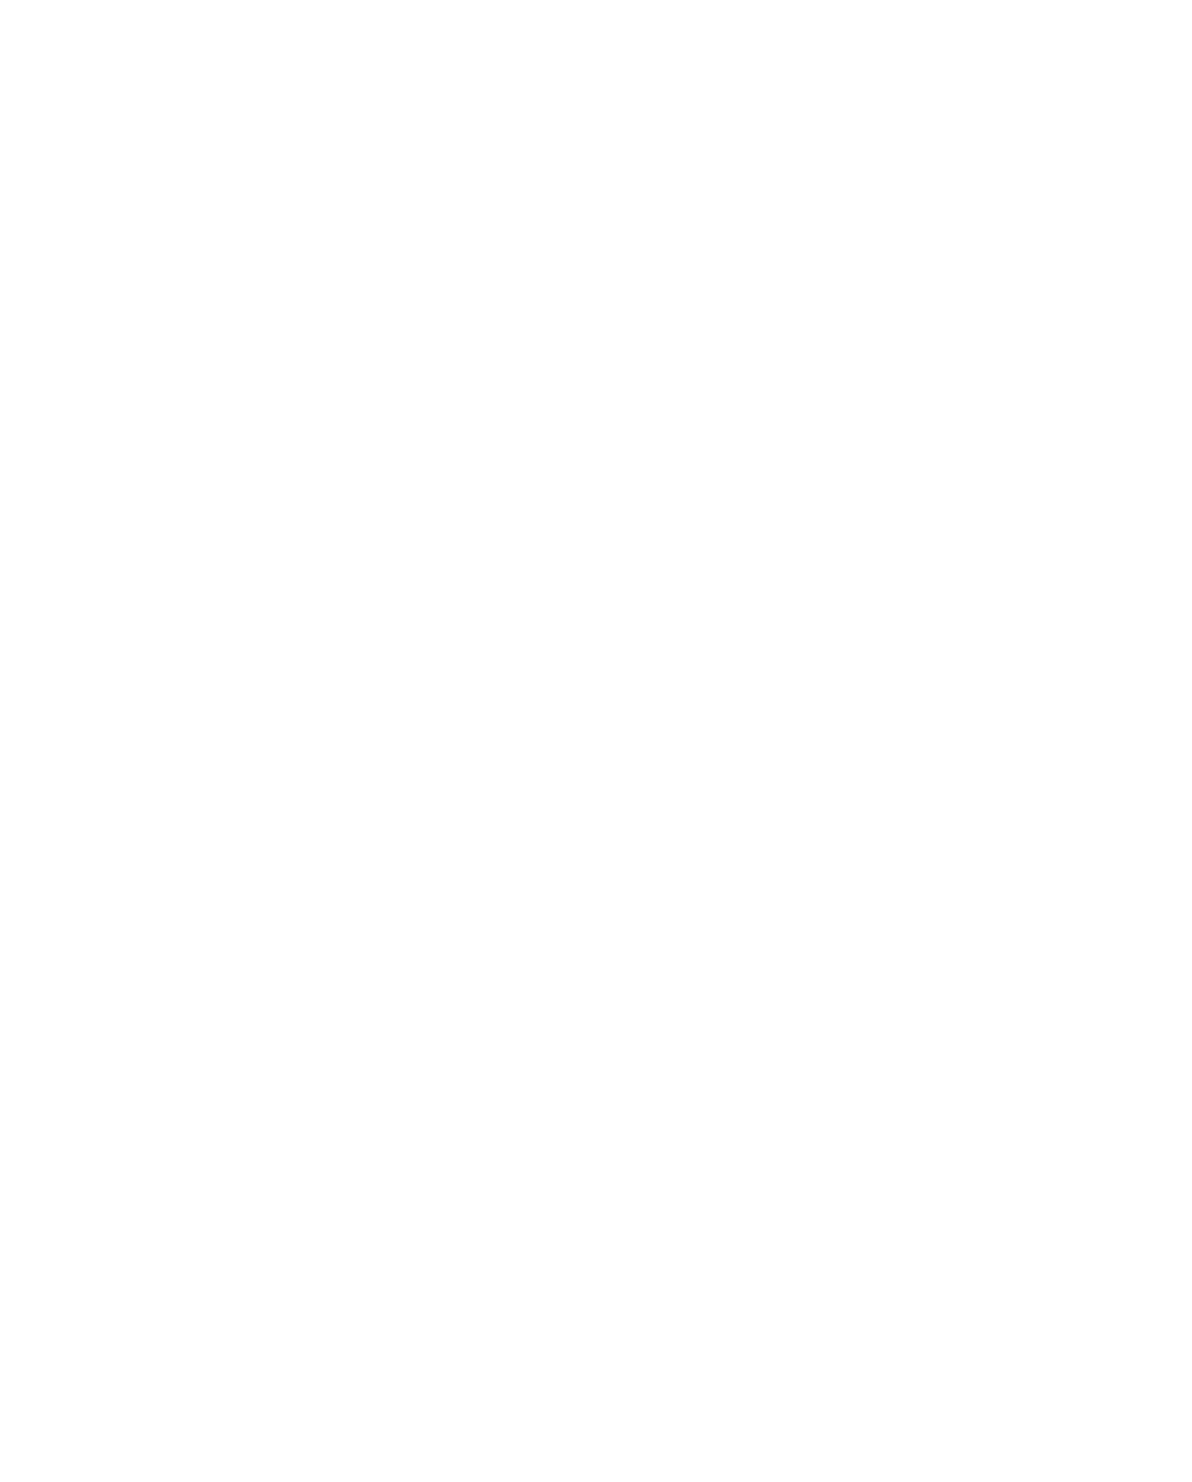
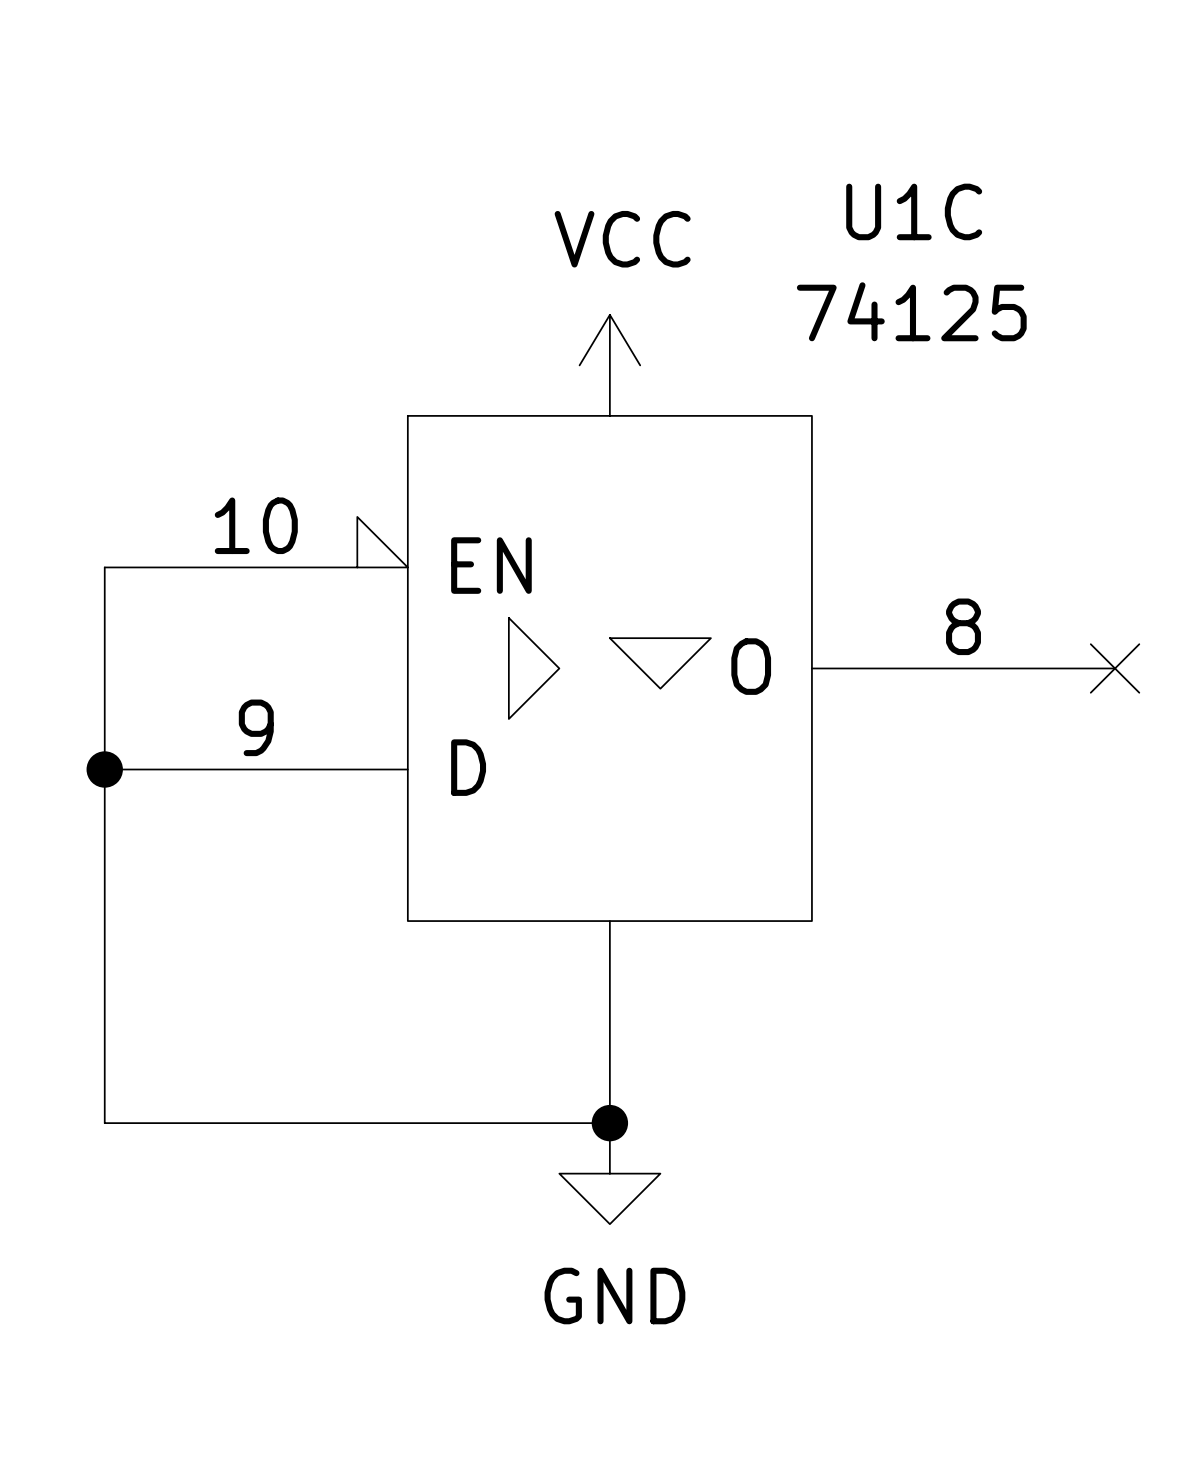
power symbol: none -> VCC (609, 365)
wire: none -> (104, 567) (104, 1123) (609, 1123) (609, 921)
U1C: none -> 74125 (609, 668)
no-connect mark: none -> (1115, 668)
junction: none -> (104, 769)
junction: none -> (609, 1123)
power symbol: none -> GND (609, 1173)

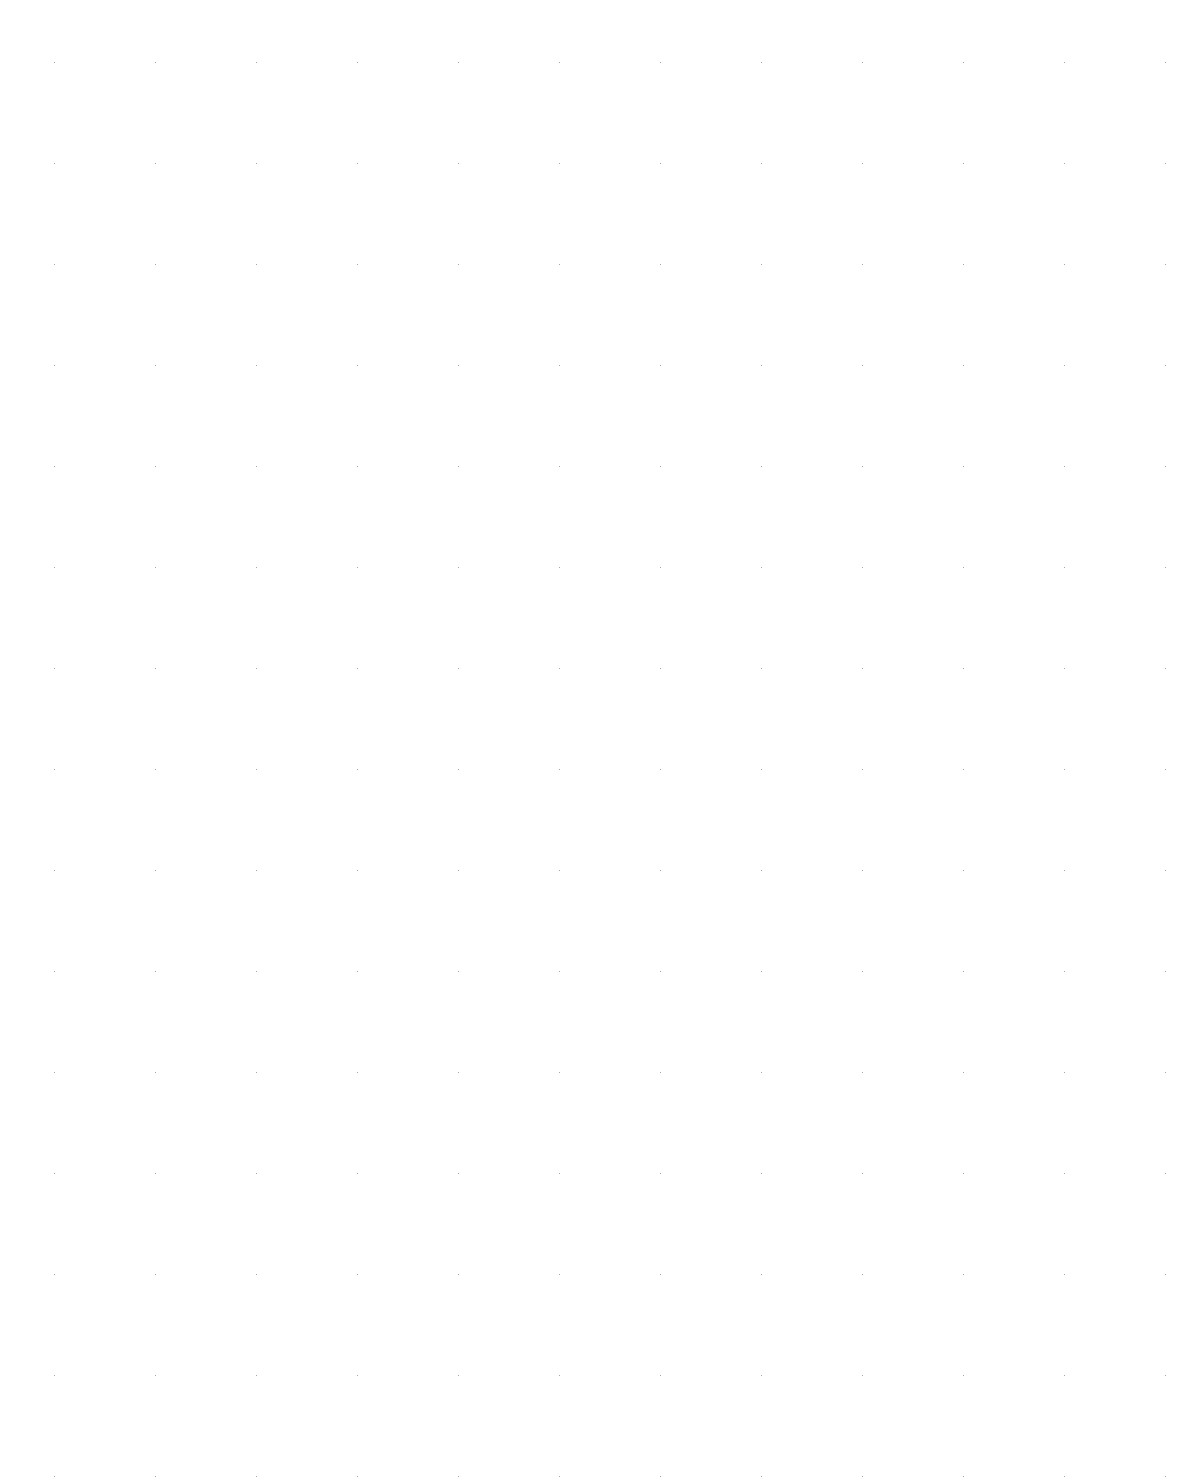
power symbol: VCC (609, 365) -> none
wire: (104, 567) (104, 1123) (609, 1123) (609, 921) -> none
U1C: 74125 (609, 668) -> none
no-connect mark: (1115, 668) -> none
junction: (104, 769) -> none
junction: (609, 1123) -> none
power symbol: GND (609, 1173) -> none

